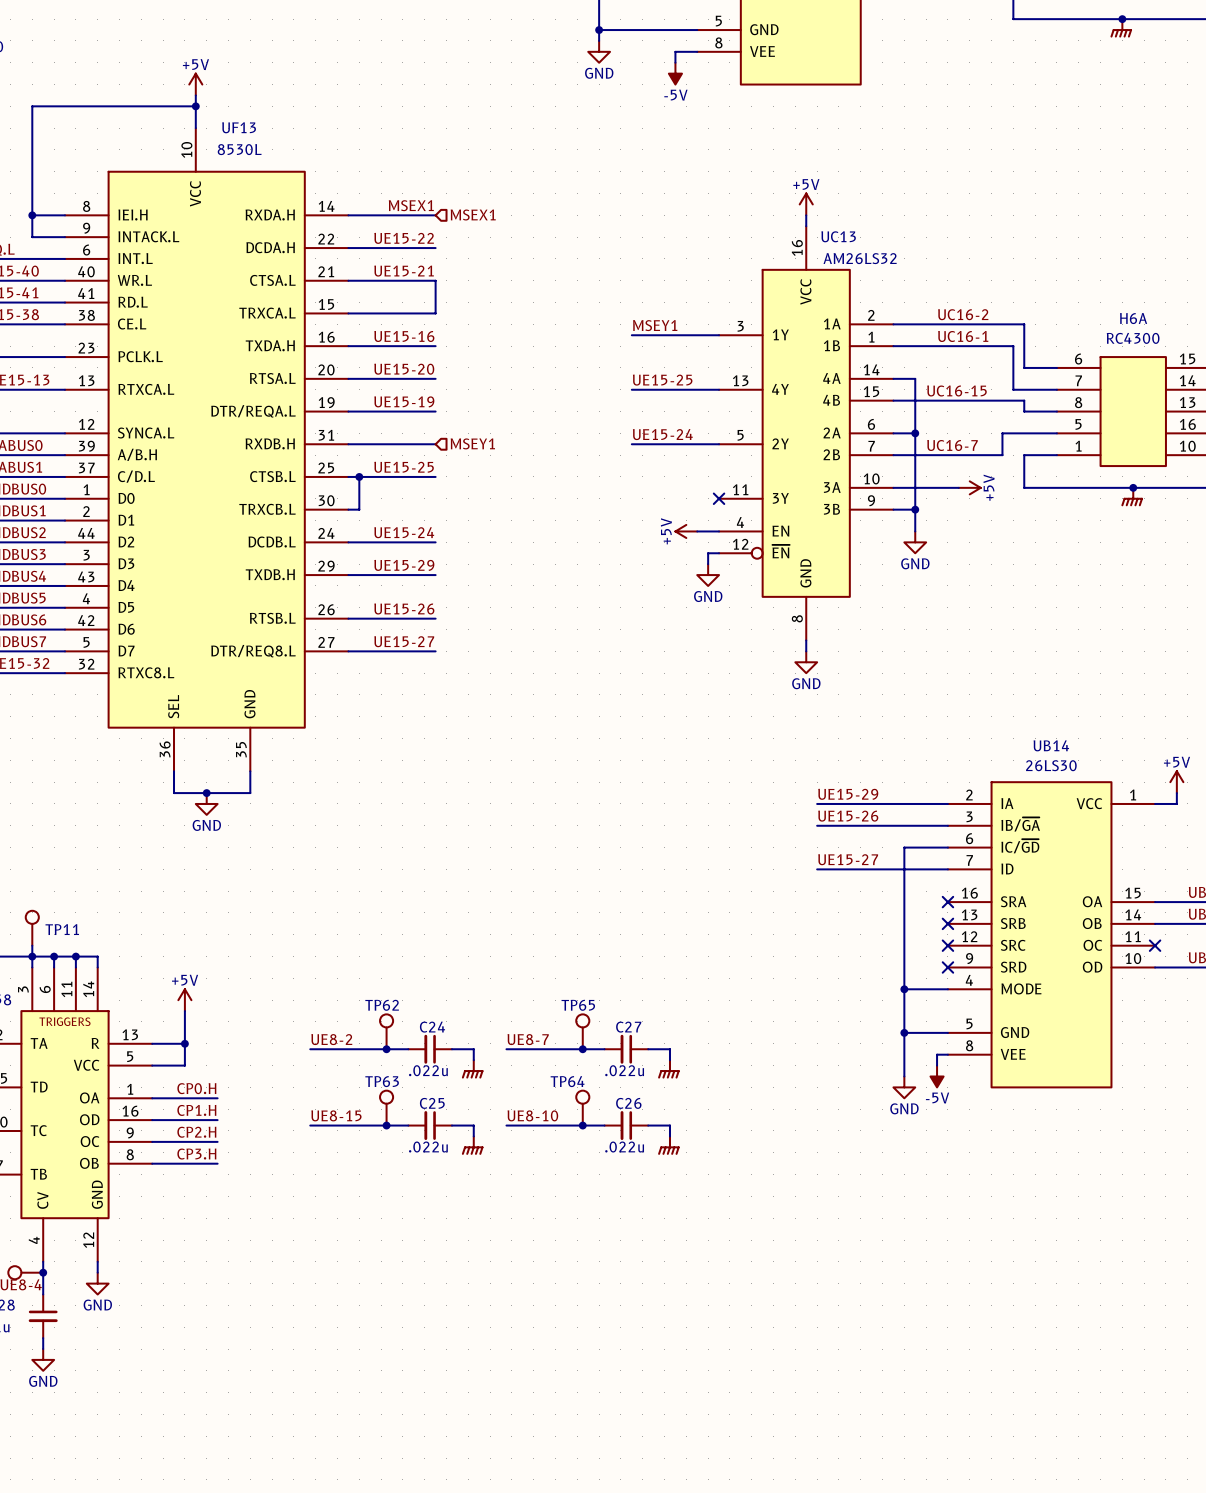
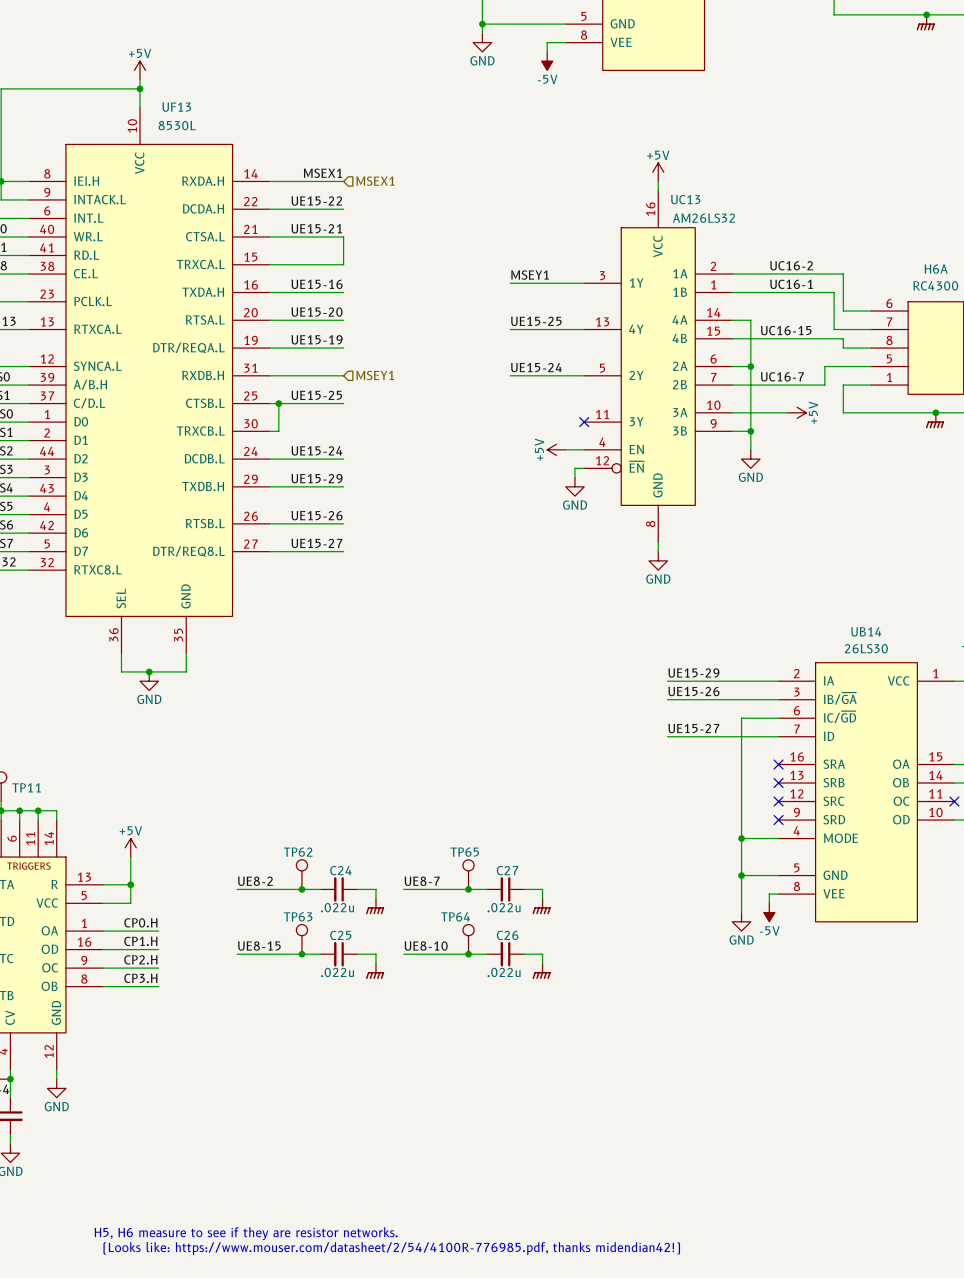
text: none -> H5, H6 measure to see if they are resistor networks. (246, 1233)
text: none -> (Looks like: https://www.mouser.com/datasheet/2/54/4100R-776985.pdf, thanks midendian42!) (391, 1248)

